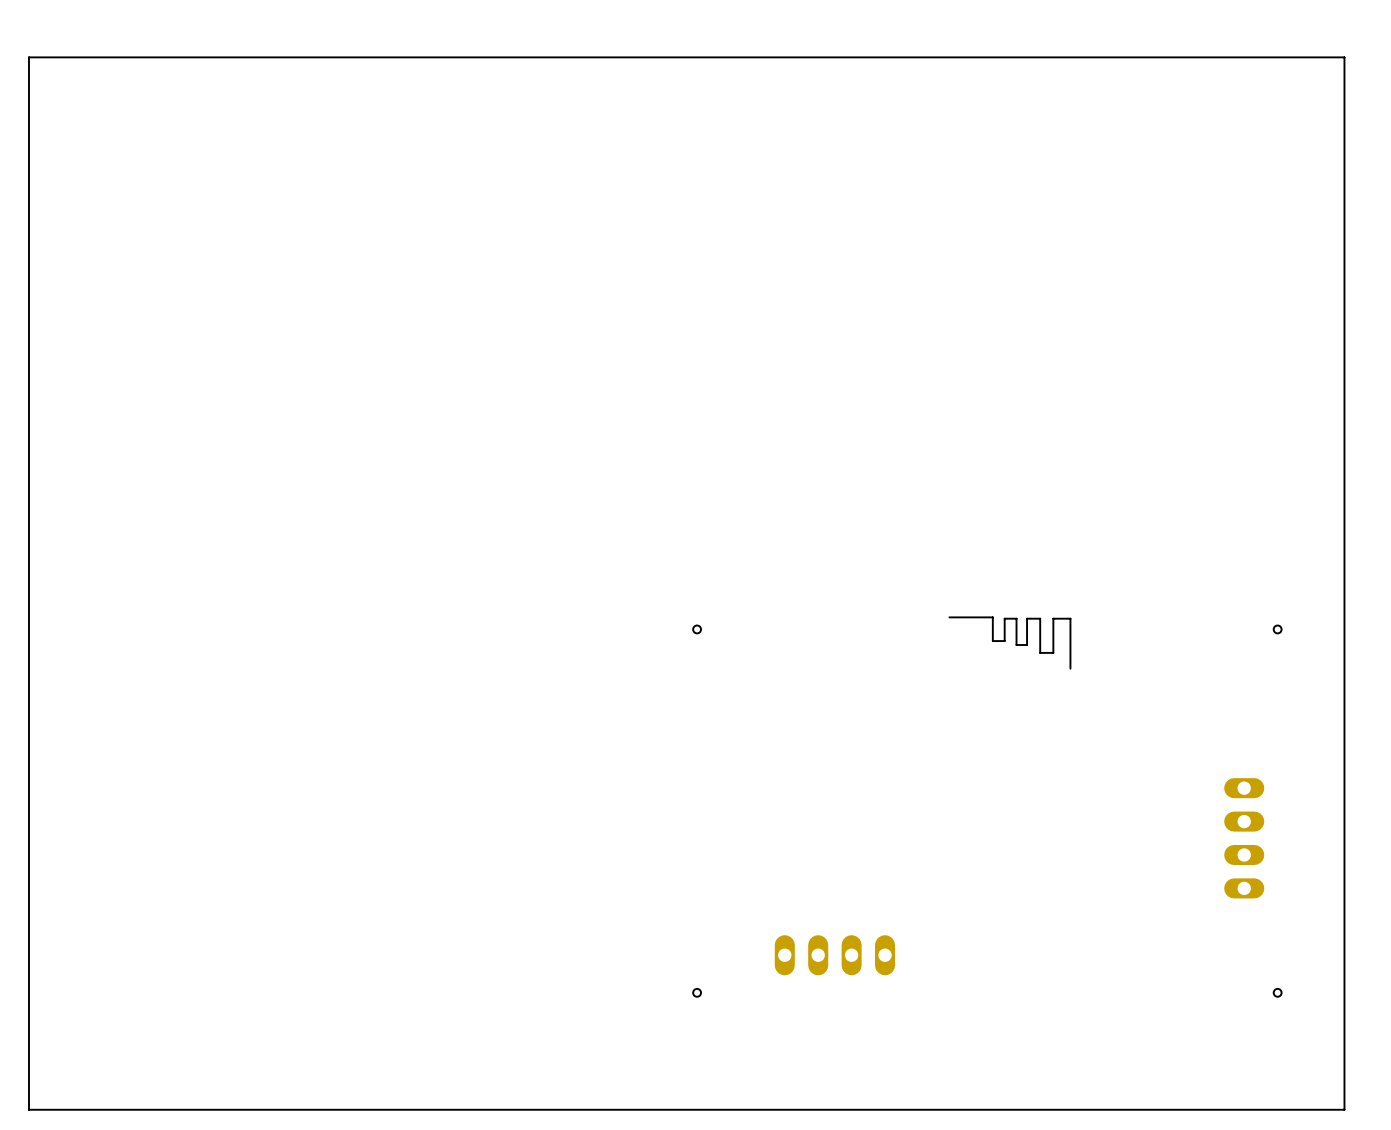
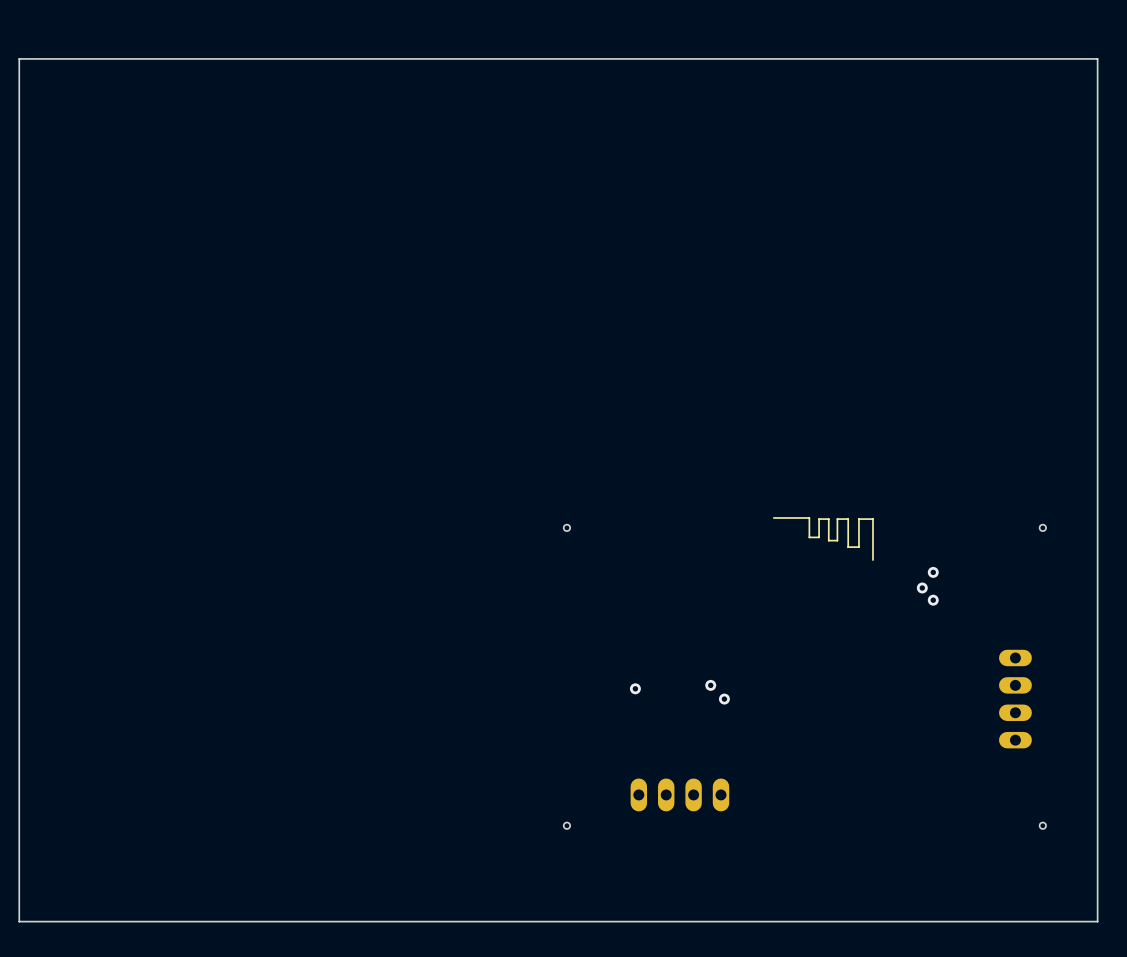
via: none -> (933, 572)
via: none -> (922, 588)
via: none -> (933, 600)
via: none -> (710, 685)
via: none -> (635, 688)
via: none -> (724, 699)

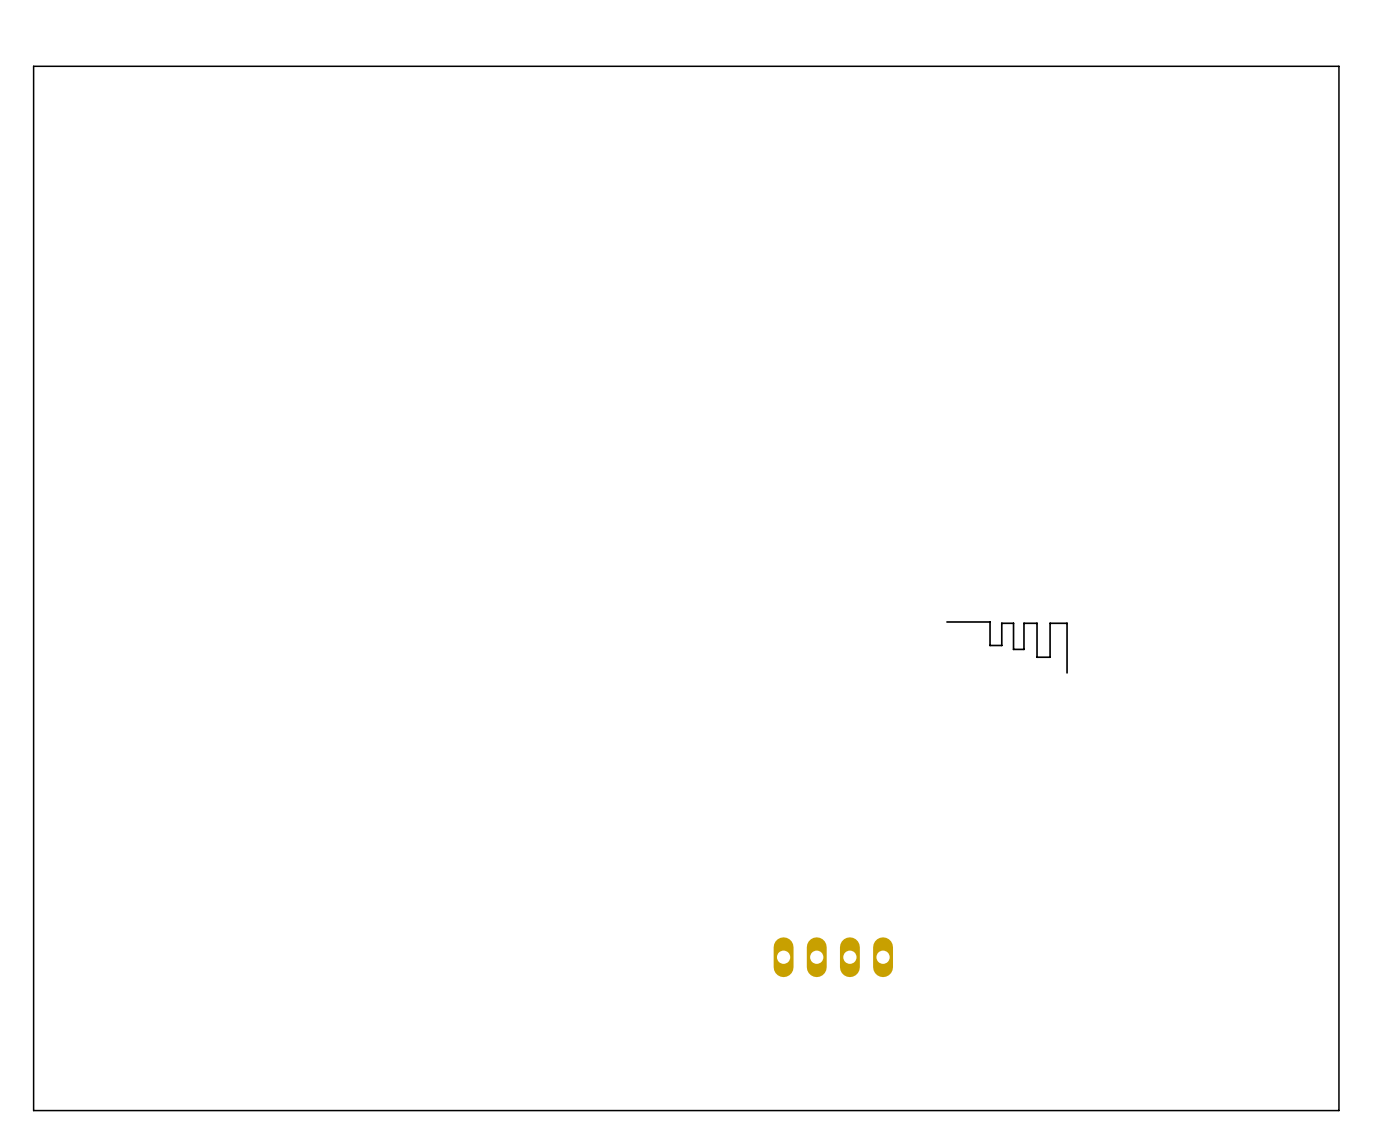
hole: (566, 527) -> none
hole: (1042, 527) -> none
via: (933, 572) -> none
via: (922, 588) -> none
via: (933, 600) -> none
via: (710, 685) -> none
via: (635, 688) -> none
via: (724, 699) -> none
part: (1015, 699) -> none
hole: (566, 825) -> none
hole: (1042, 825) -> none

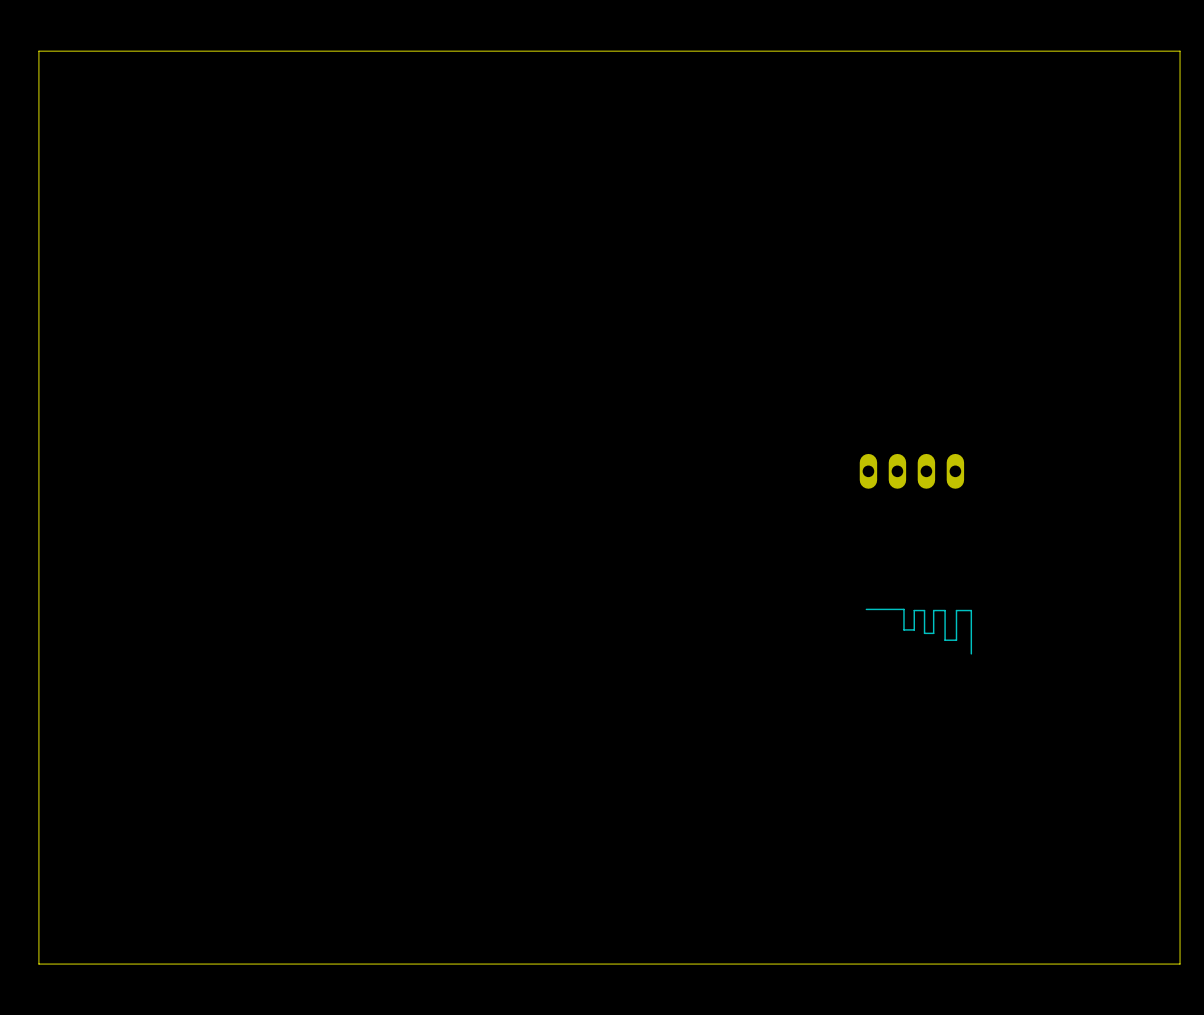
part: none -> (911, 471)
part position: (1007, 647) -> (918, 631)
part: (833, 957) -> none

